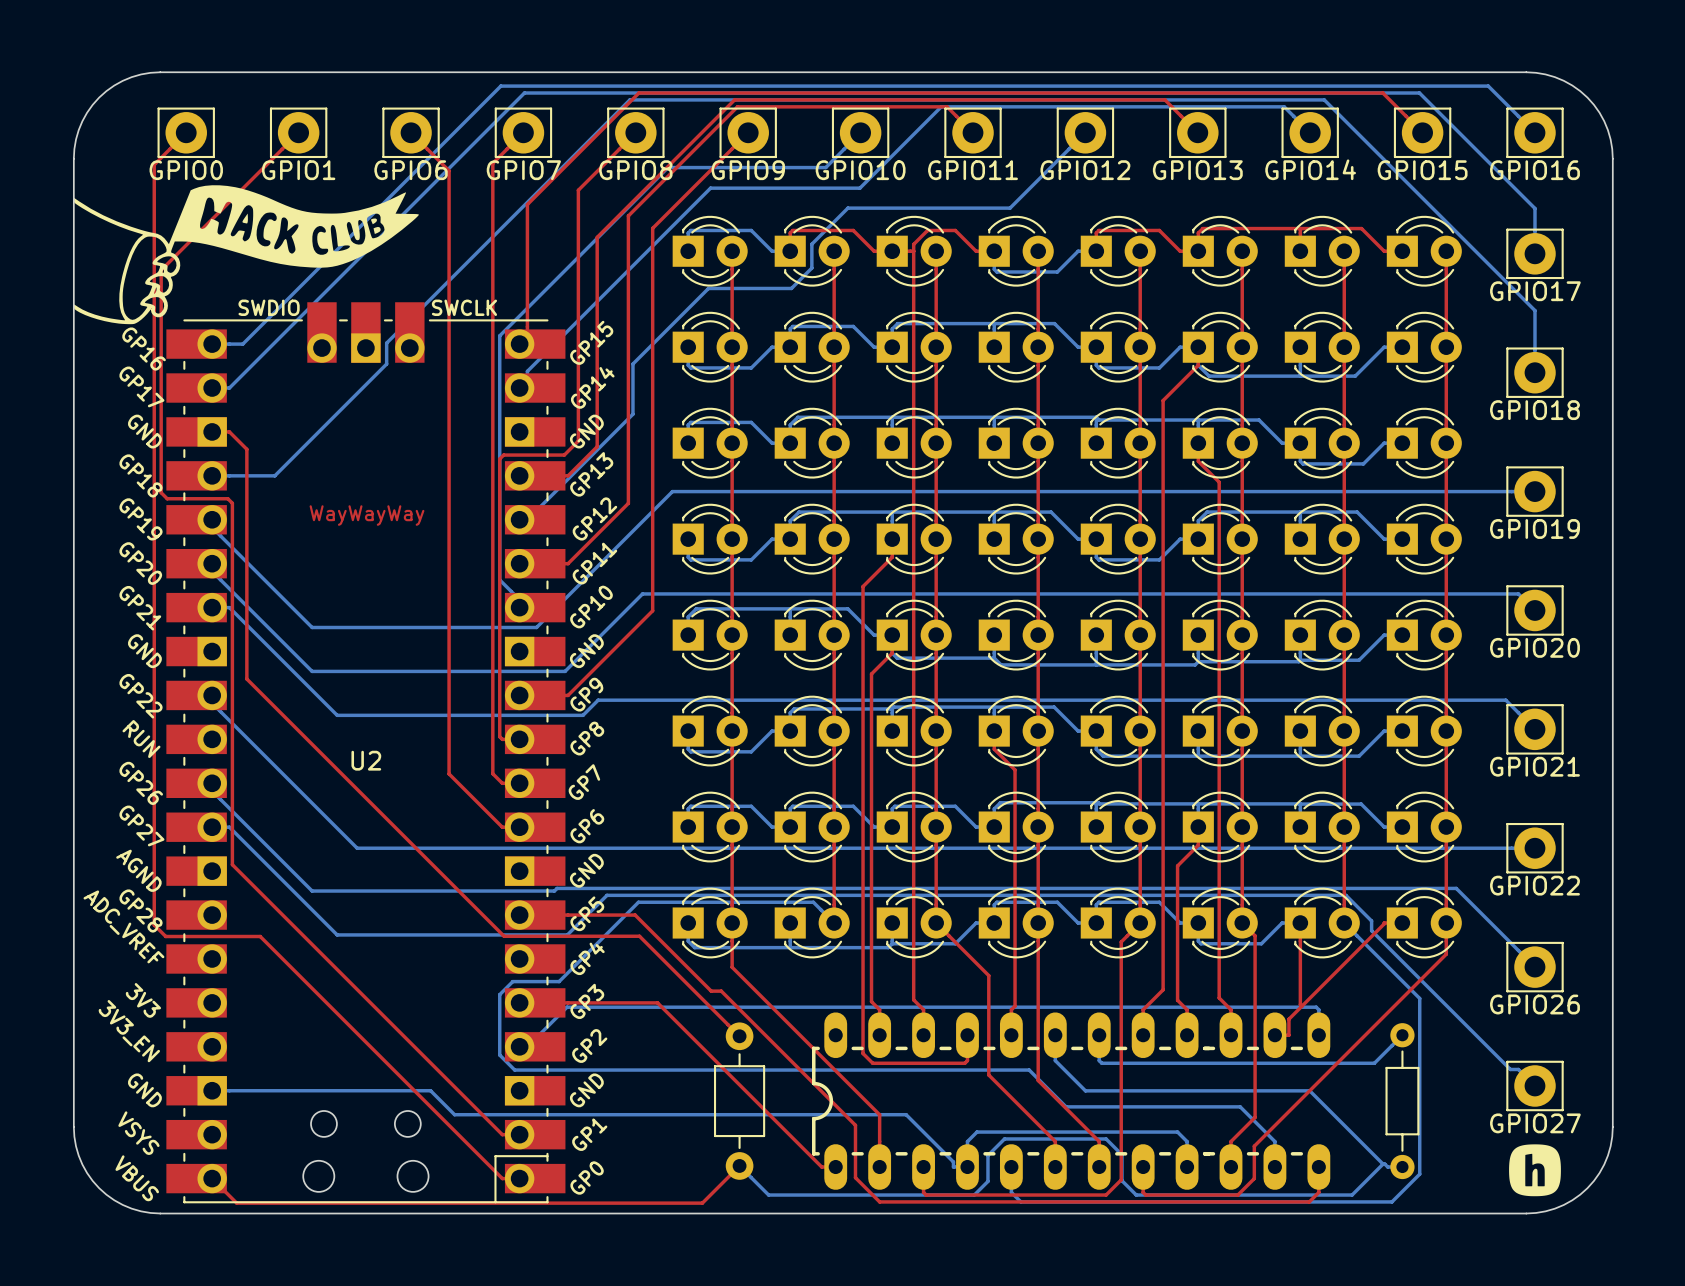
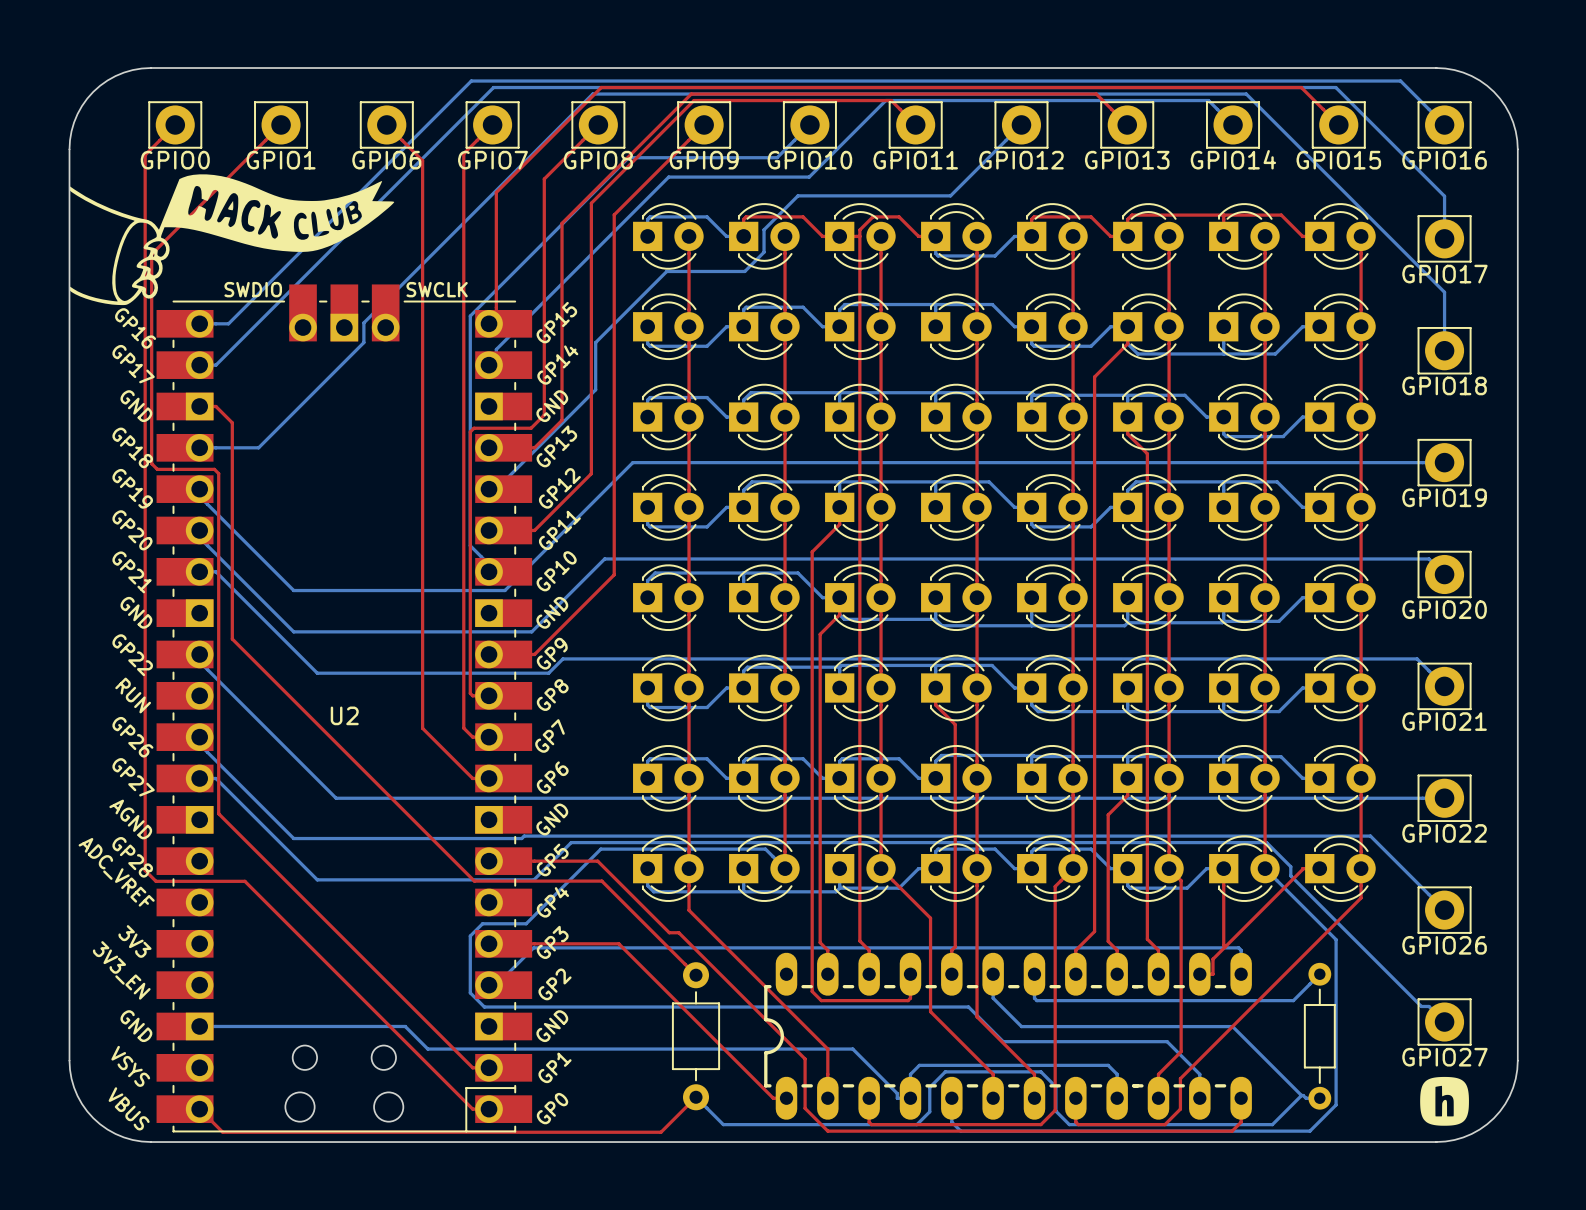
text: WayWayWay (367, 515) -> none

